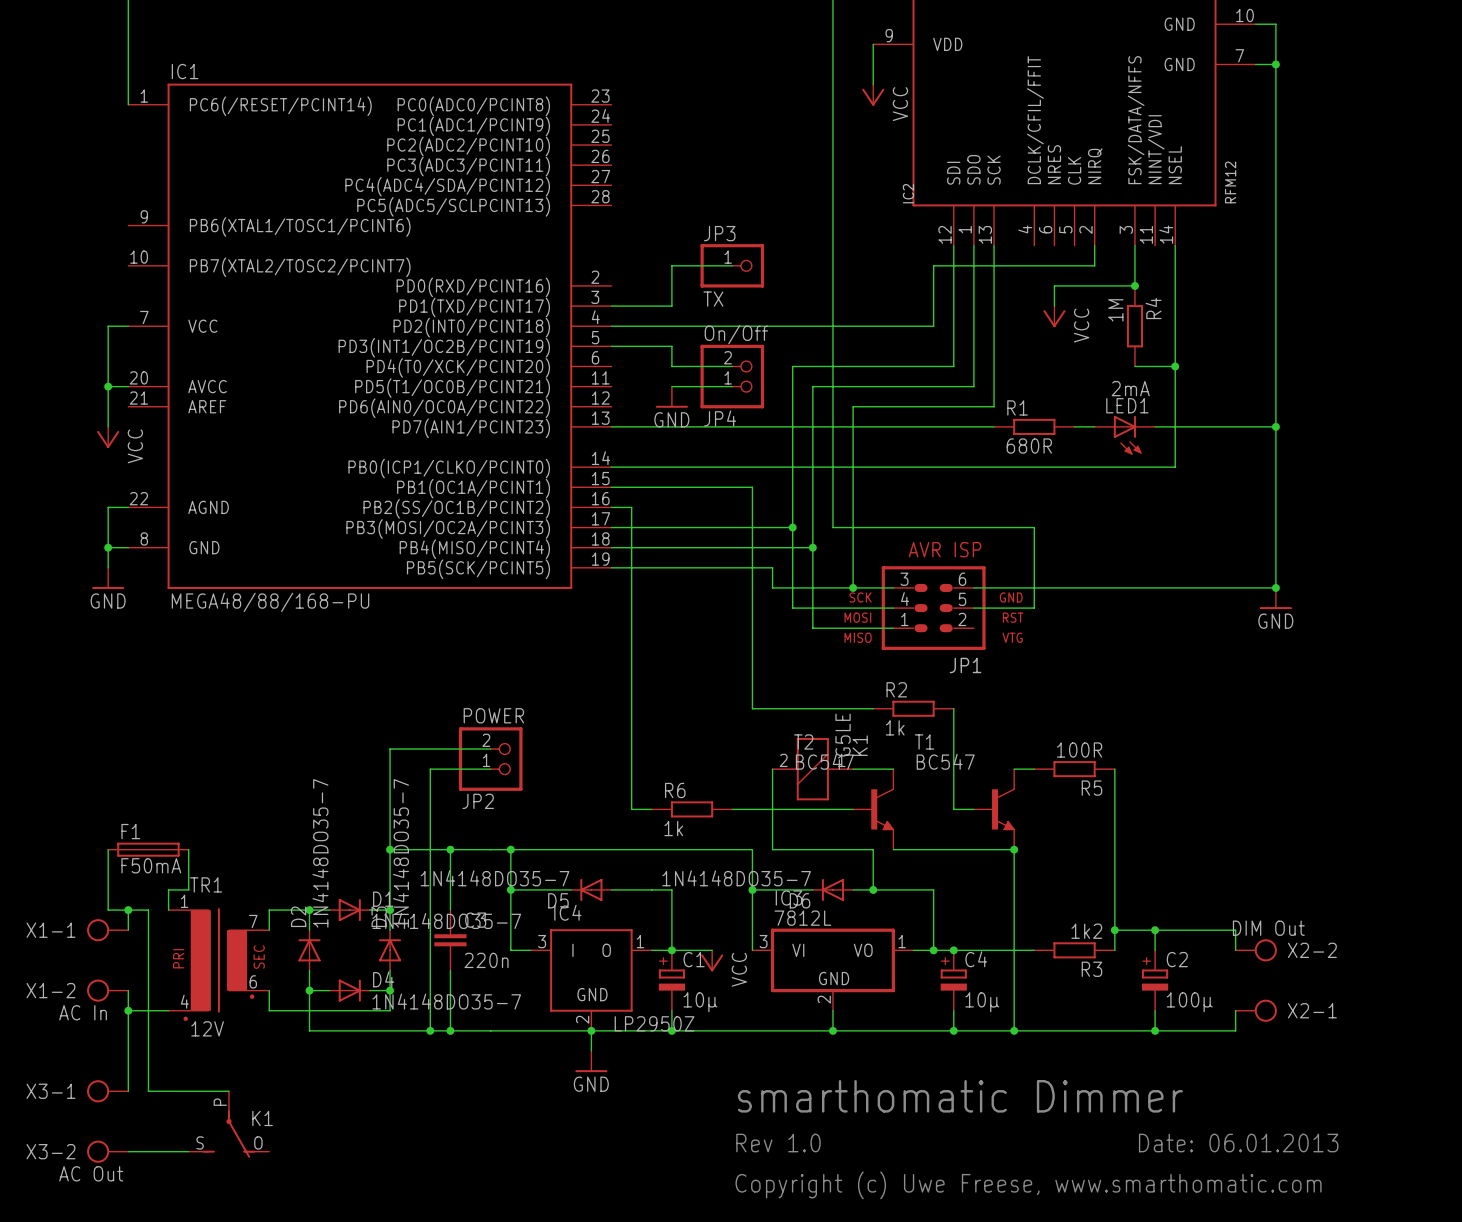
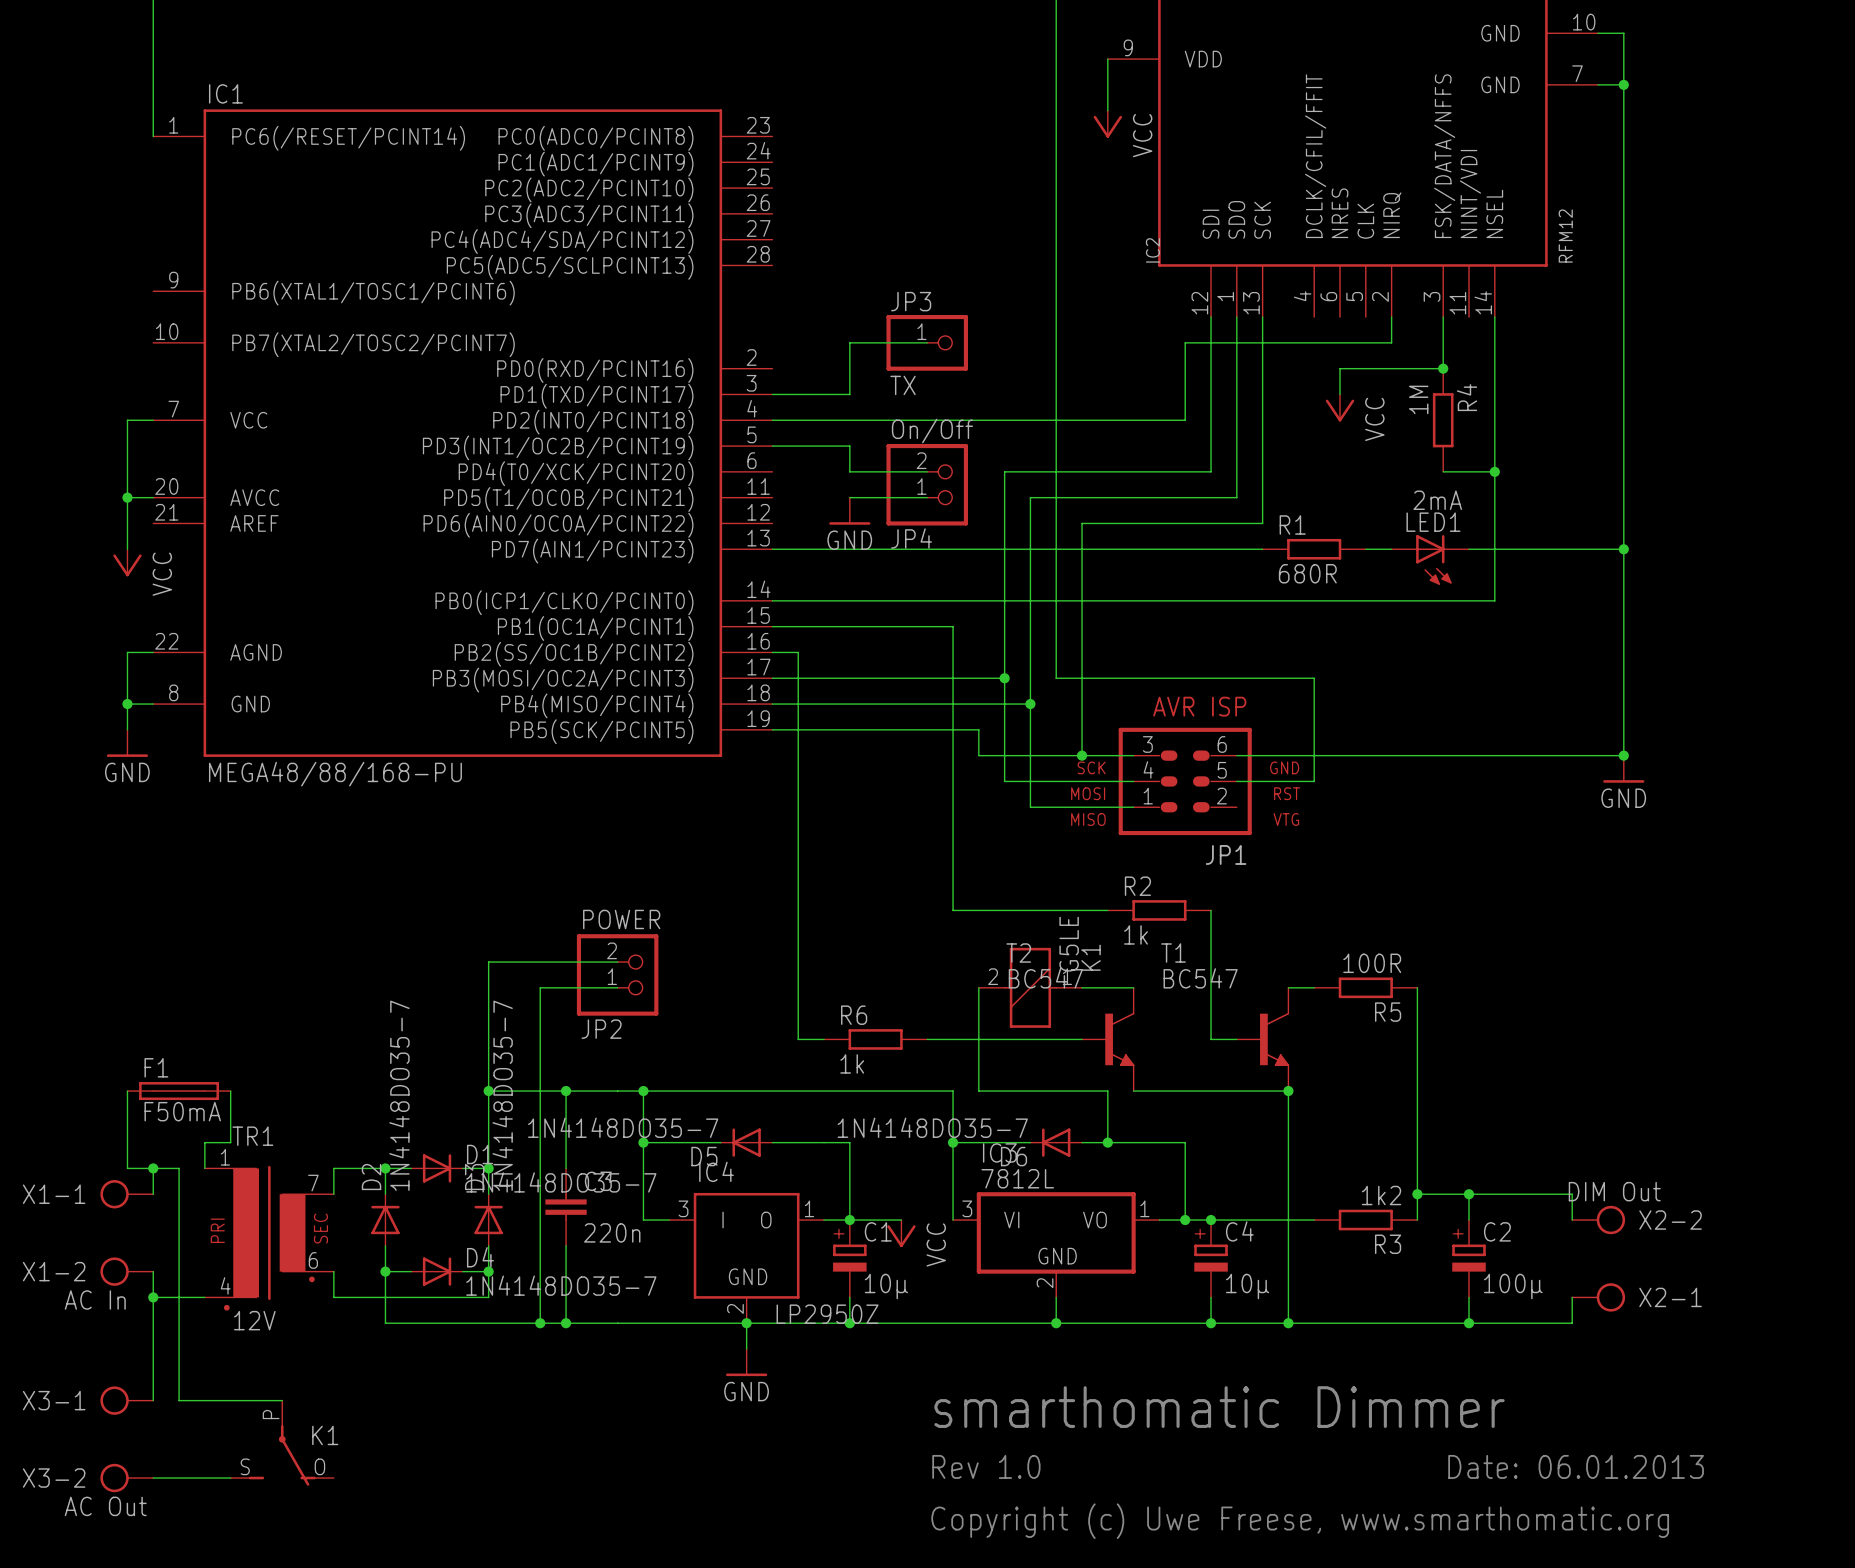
text: Copyright (c) Uwe Freese, www.smarthomatic.com (1028, 1185) -> Copyright (c) Uwe Freese, www.smarthomatic.org (1300, 1521)

